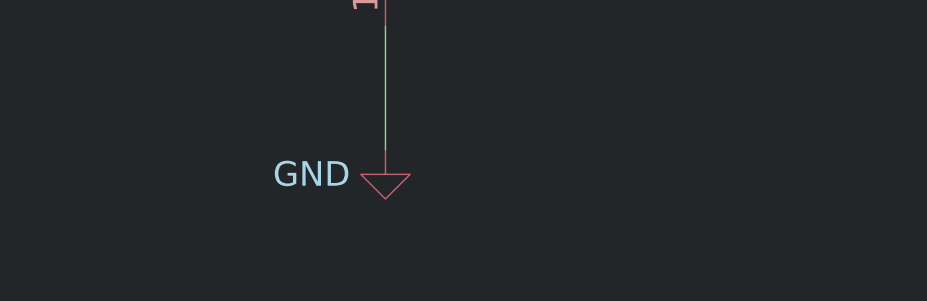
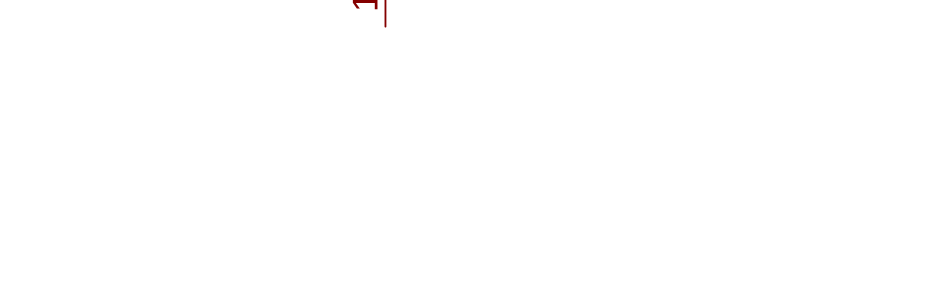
wire: (385, 26) (385, 149) -> none
power symbol: GND (385, 174) -> none

